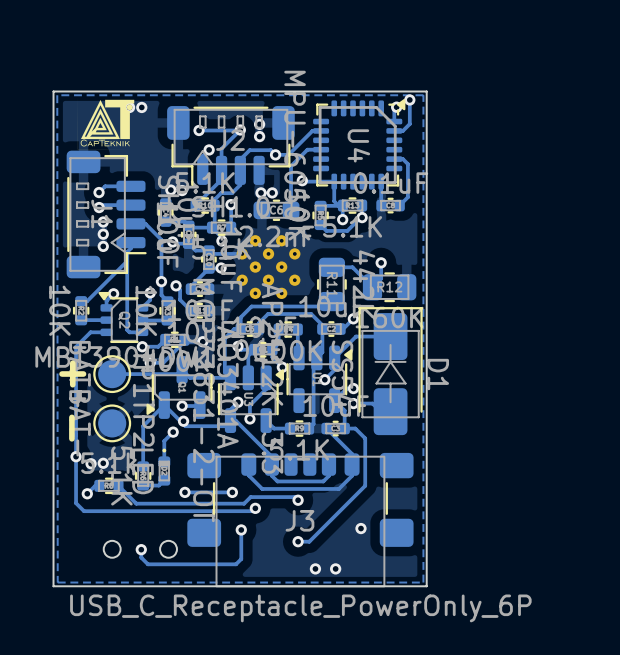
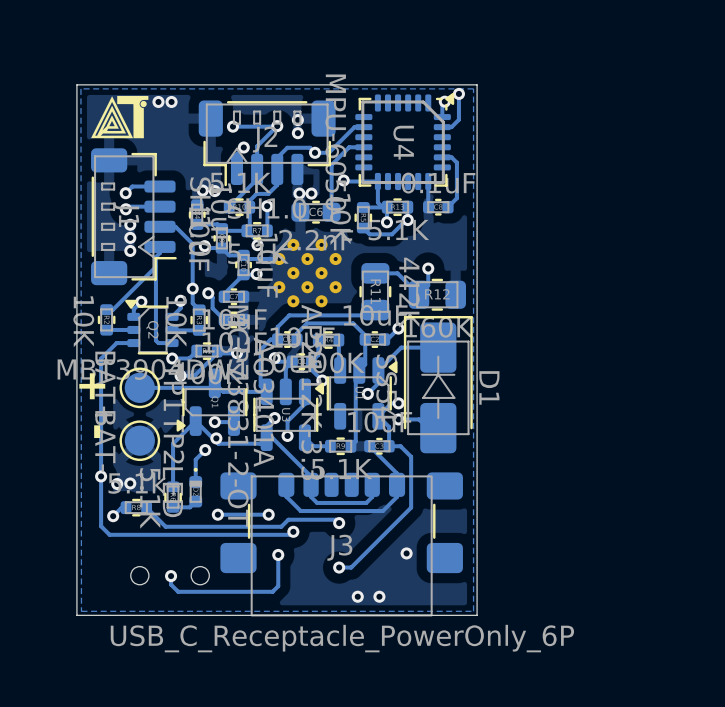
drawing shape: [77, 93, 135, 150] -> [91, 95, 149, 139]

